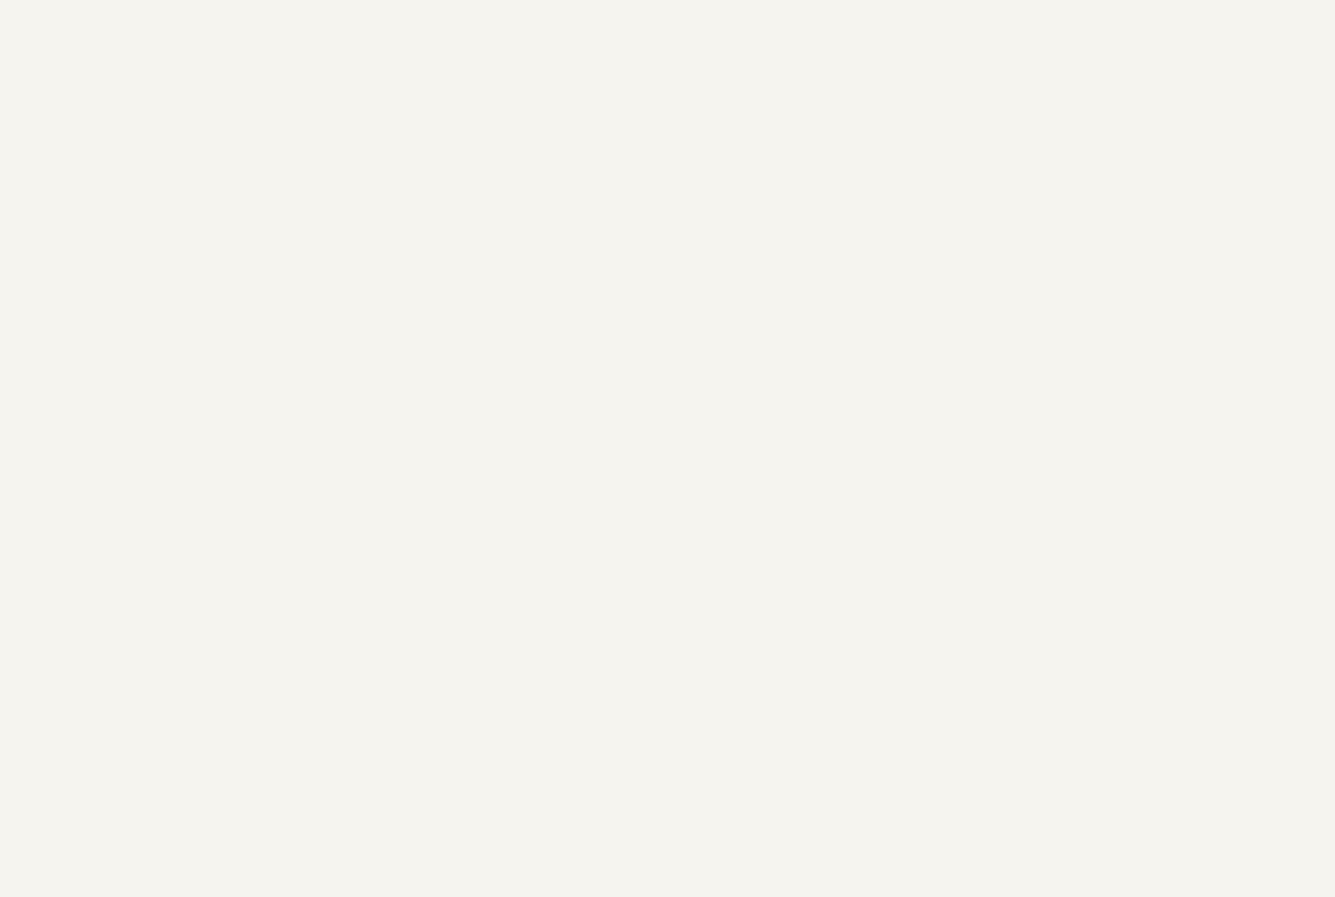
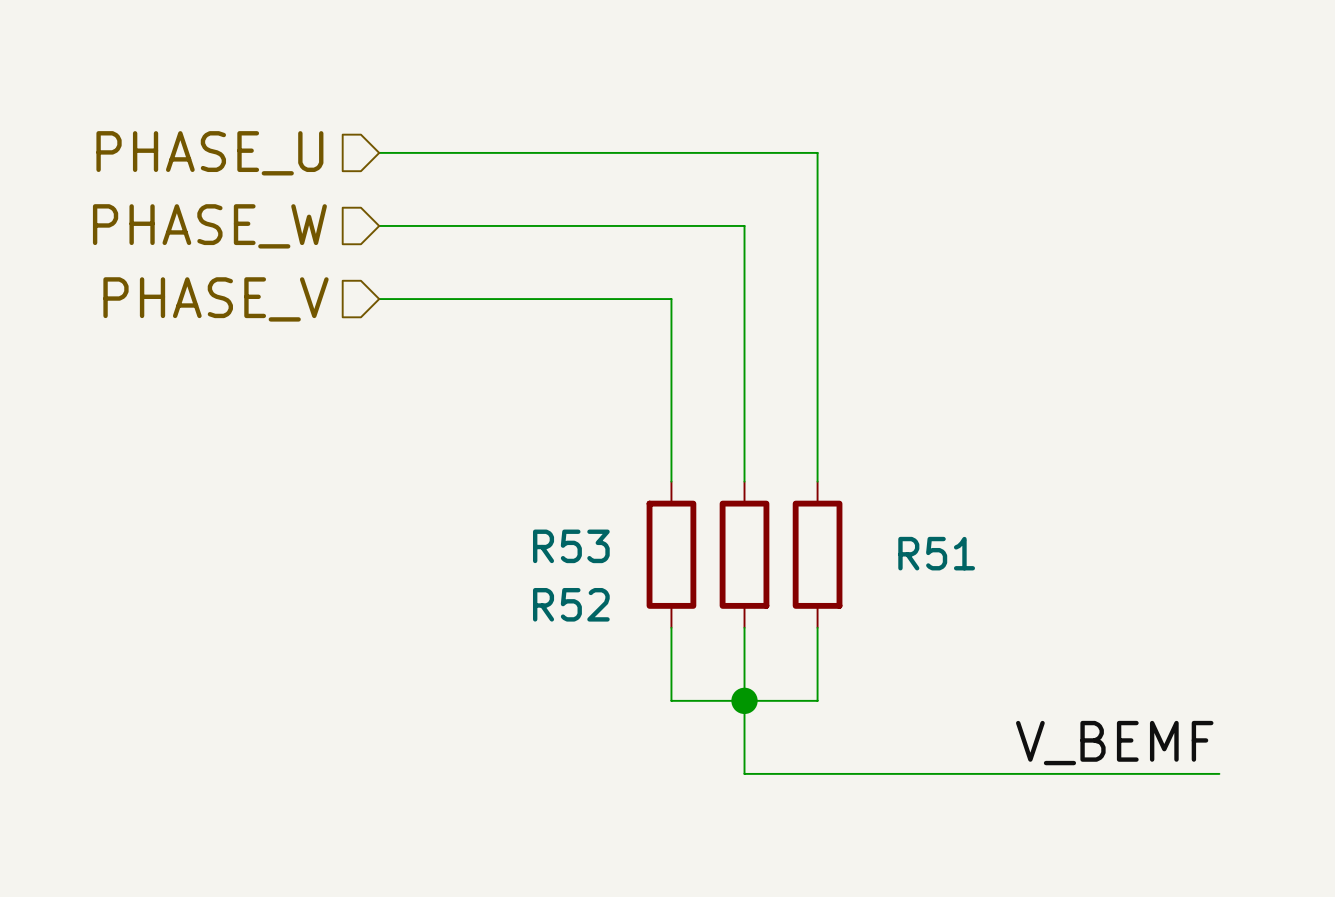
wire: none -> (379, 152) (817, 152) (817, 481)
hierarchical label: none -> PHASE_U (209, 153)
wire: none -> (379, 225) (744, 225) (744, 481)
hierarchical label: none -> PHASE_W (209, 226)
wire: none -> (379, 299) (671, 299) (671, 481)
hierarchical label: none -> PHASE_V (216, 299)
R53: none -> (671, 554)
R52: none -> (744, 554)
R51: none -> (817, 554)
wire: none -> (671, 627) (671, 700) (817, 700) (817, 627)
wire: none -> (744, 627) (744, 773) (1219, 773)
junction: none -> (744, 700)
label: none -> V_BEMF (1114, 743)

